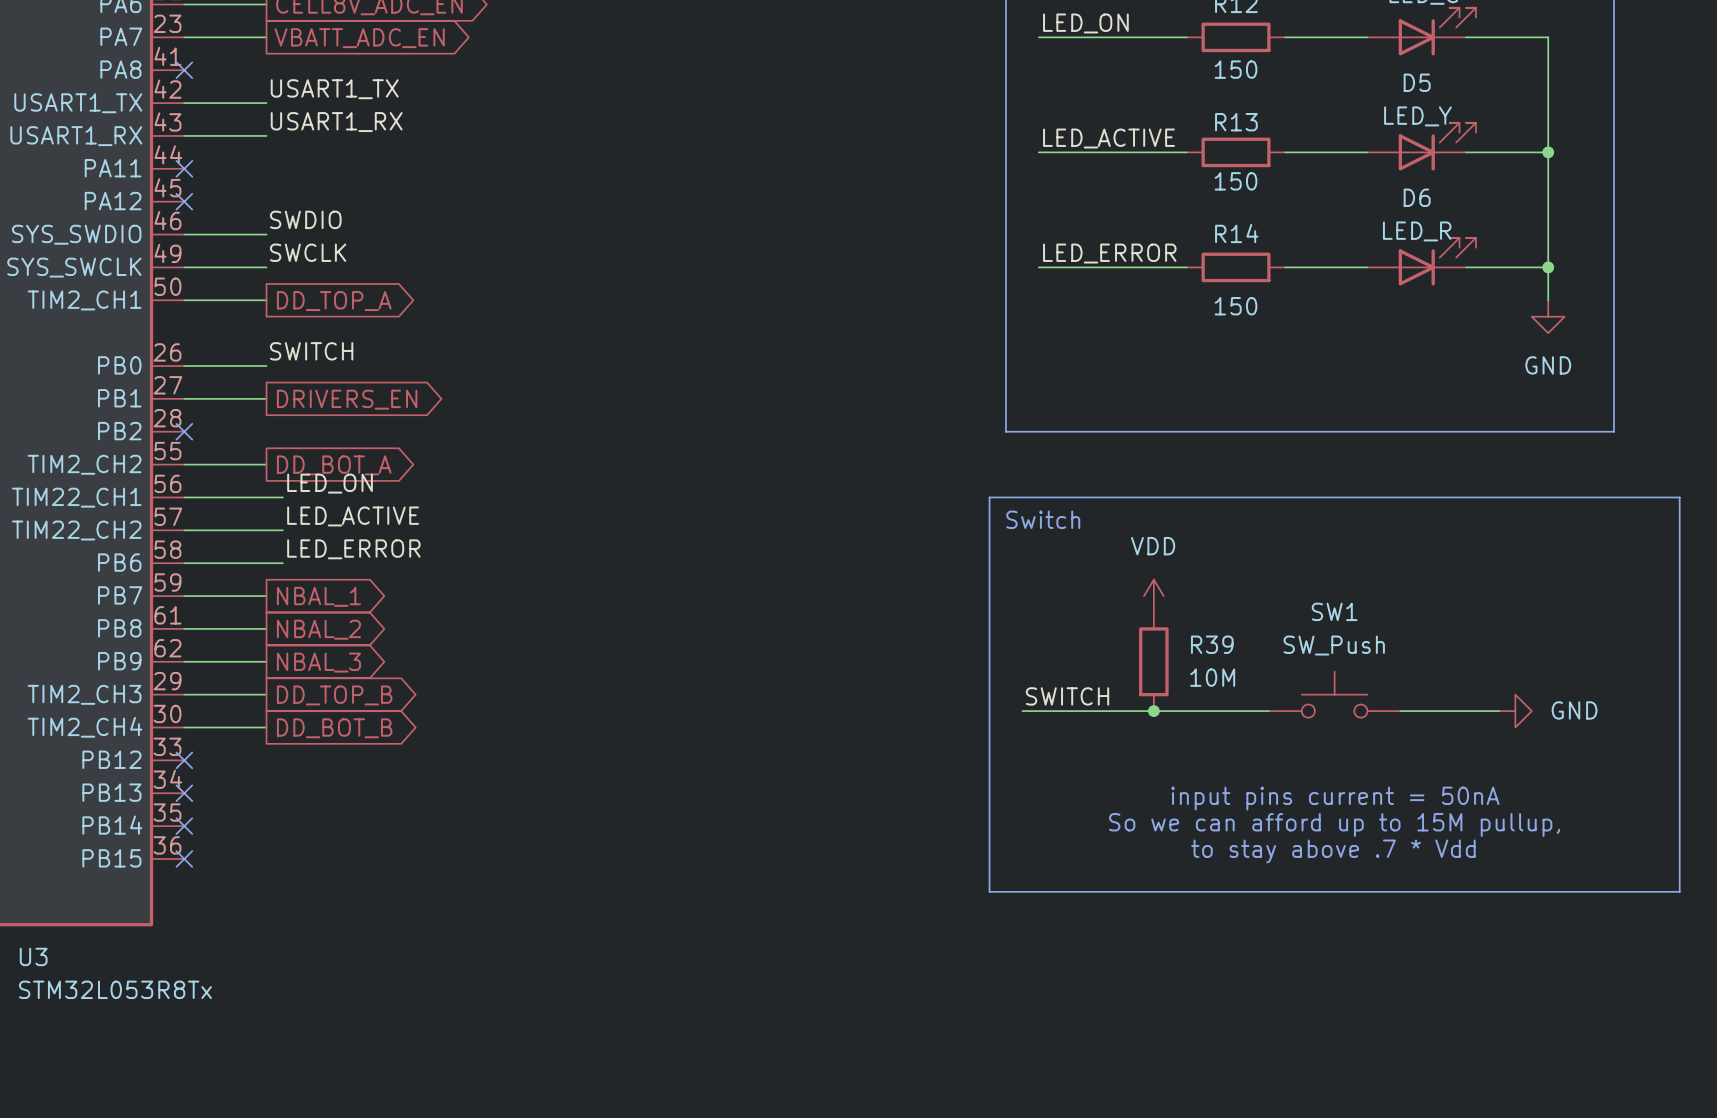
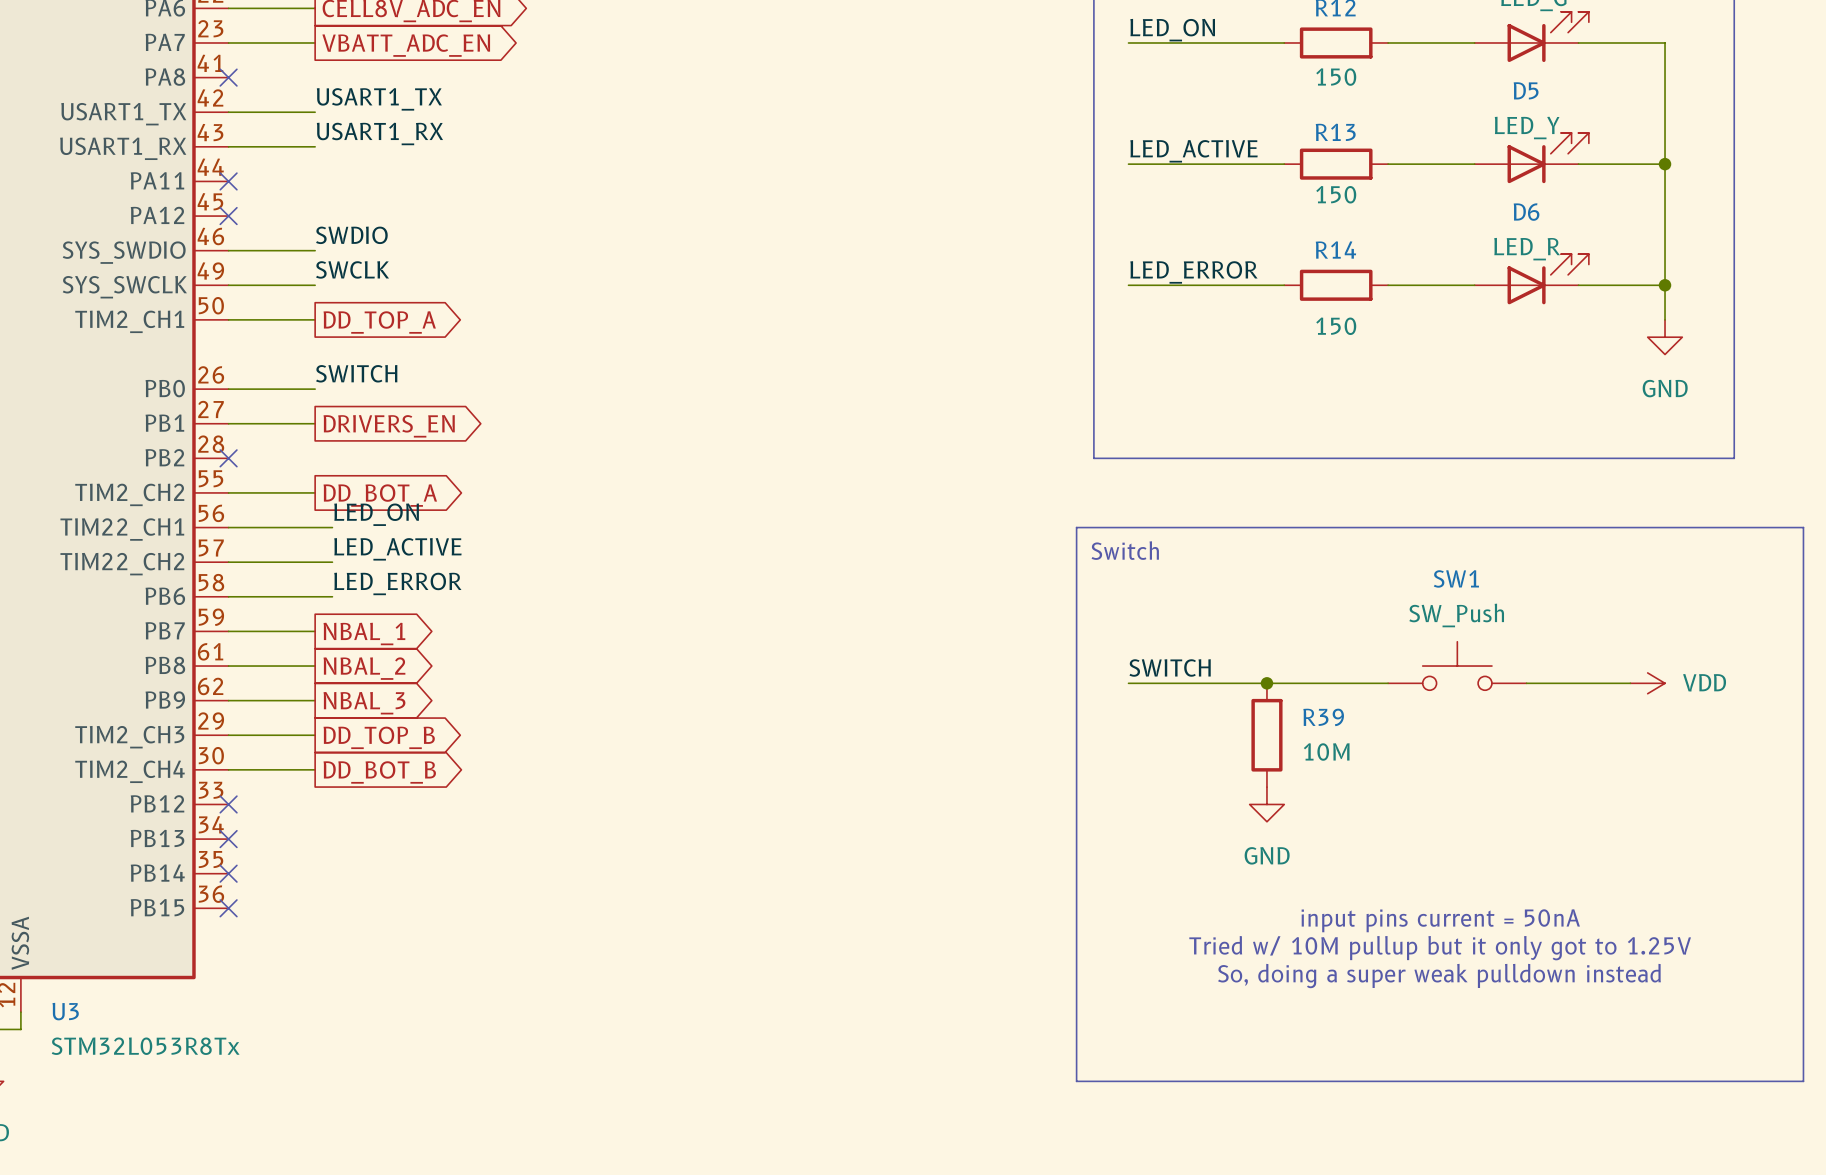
power symbol: VDD (1153, 596) -> none
power symbol: none -> VDD (1647, 683)
R39 position: (1153, 661) -> (1266, 735)
SW1 position: (1334, 694) -> (1457, 666)
label position: SWITCH (1067, 696) -> SWITCH (1170, 667)
wire: (1022, 711) (1268, 711) -> (1128, 683) (1388, 683)
junction position: (1153, 711) -> (1266, 683)
wire: (1400, 711) (1498, 711) -> (1526, 683) (1630, 683)
power symbol: GND (1515, 711) -> none
power symbol: none -> GND (1266, 804)
text position: input pins current = 50nA (1335, 798) -> input pins current = 50nA (1440, 920)
text: So we can afford up to 15M pullup, (1334, 825) -> none
text: to stay above .7 * Vdd (1333, 851) -> none
line: (989, 891) (1679, 891) -> (1076, 942) (1076, 1081) (1803, 1081) (1803, 942)
text: none -> Tried w/ 10M pullup but it only got to 1.25V (1440, 948)
text: none -> So, doing a super weak pulldown instead (1439, 976)

